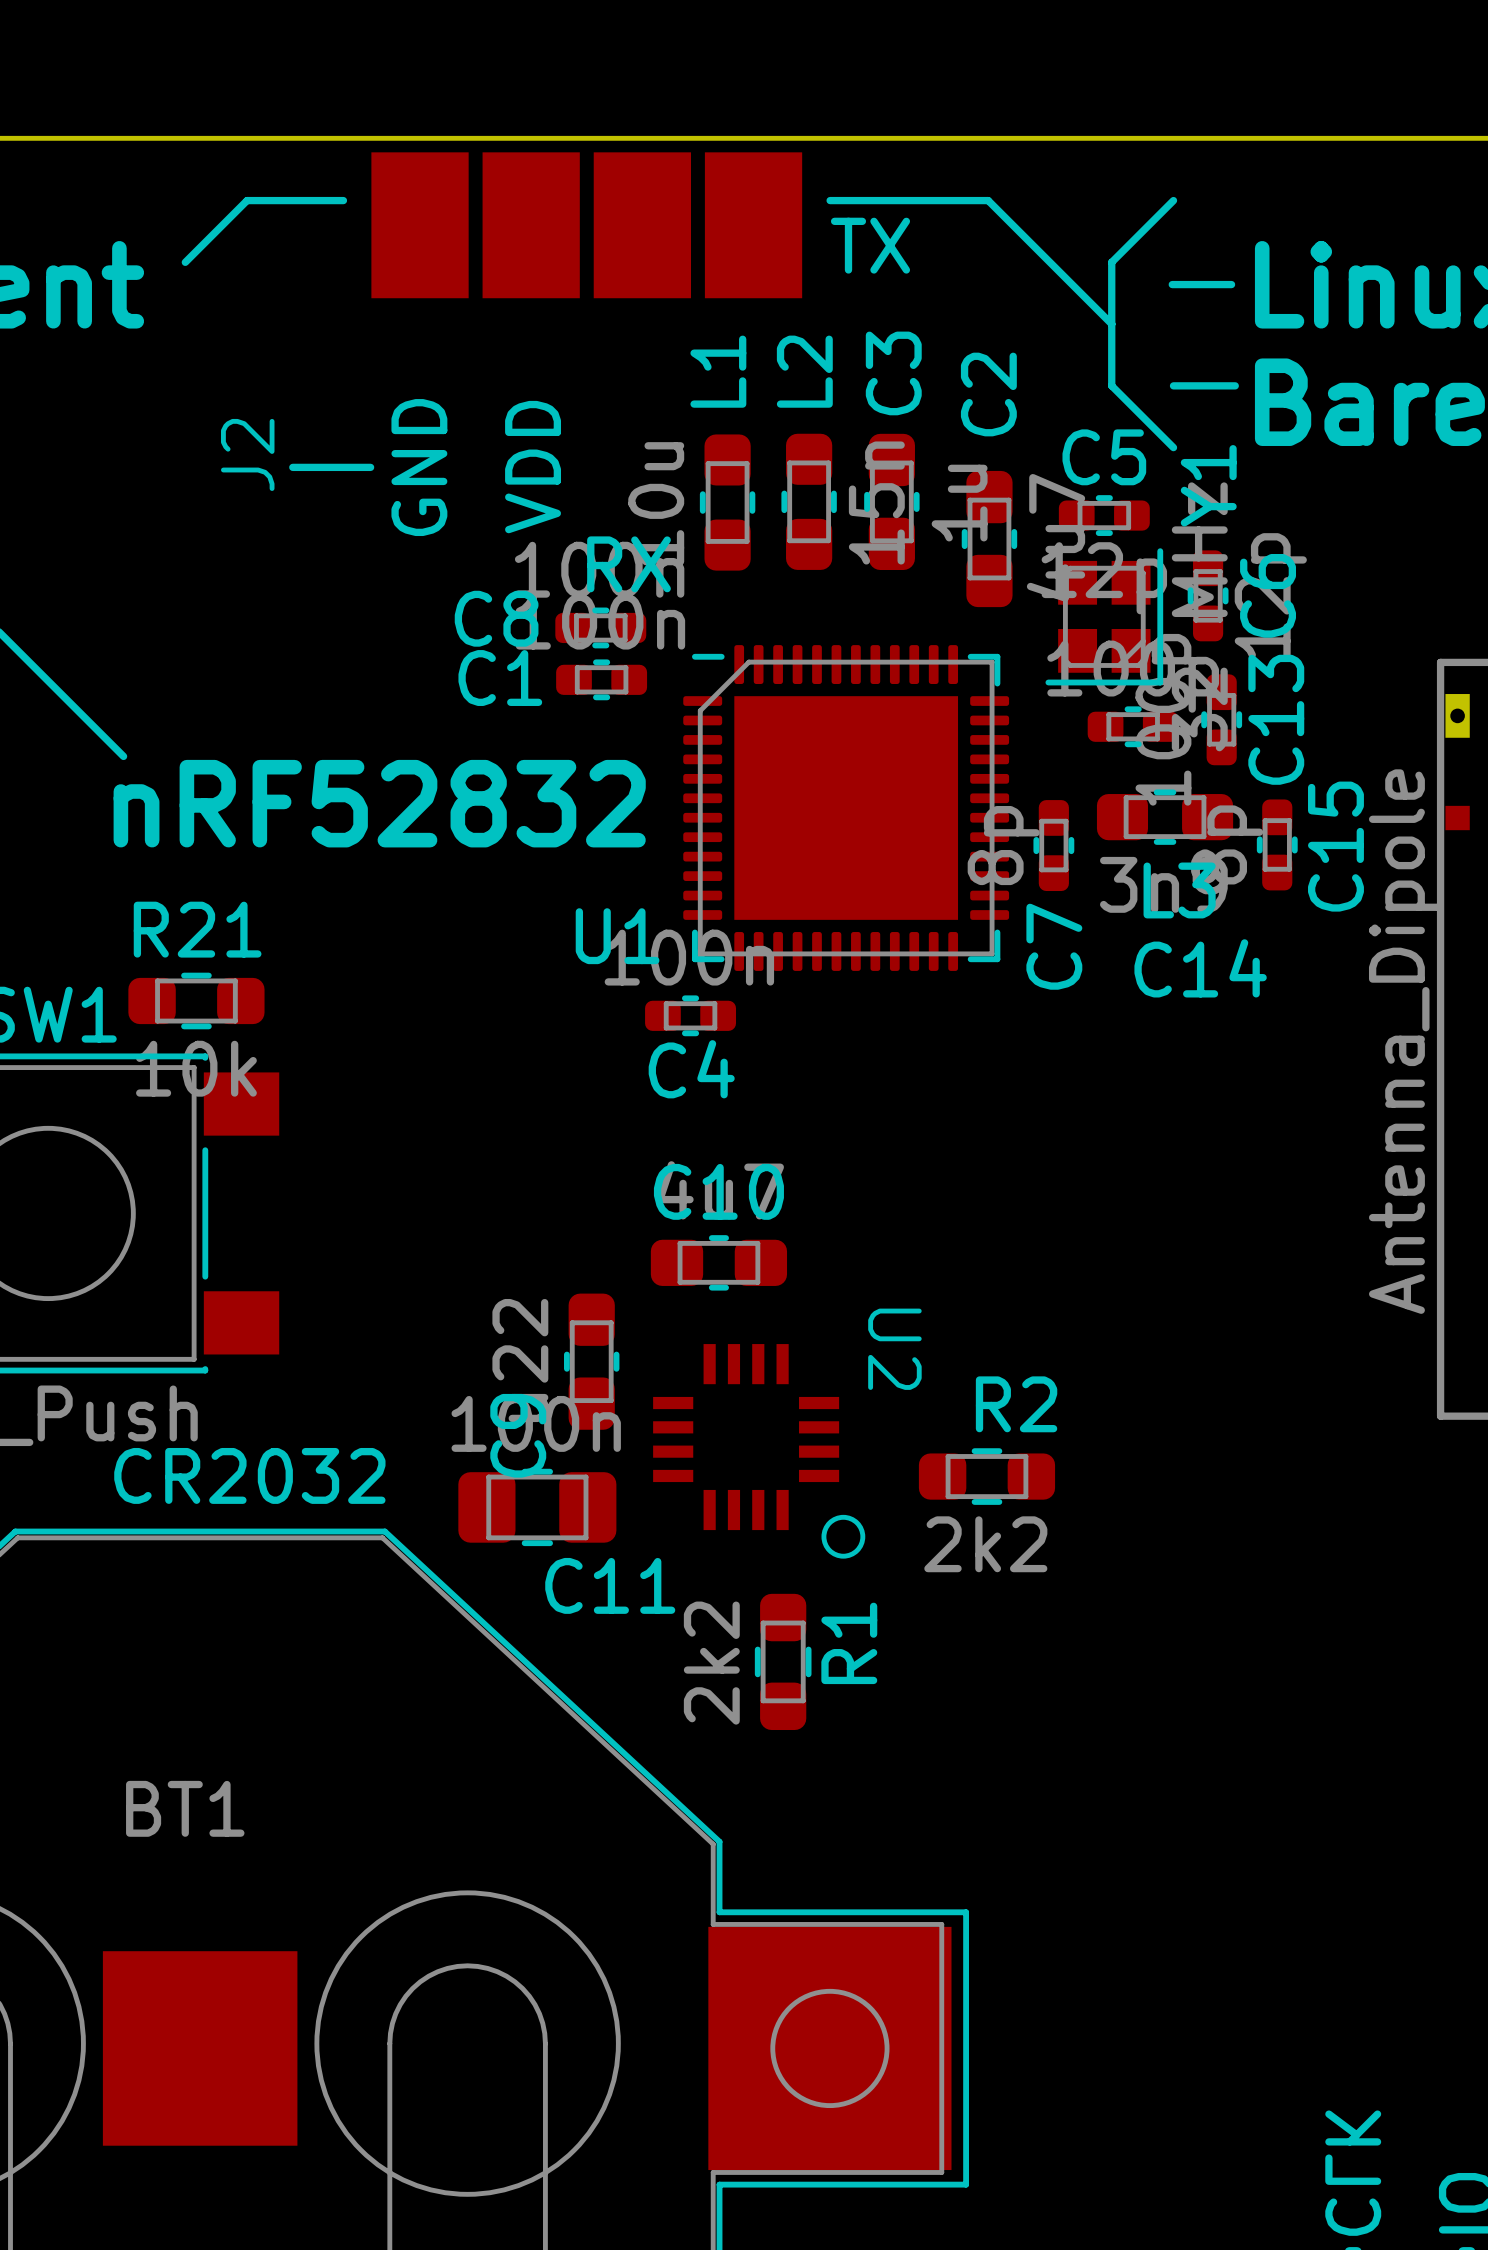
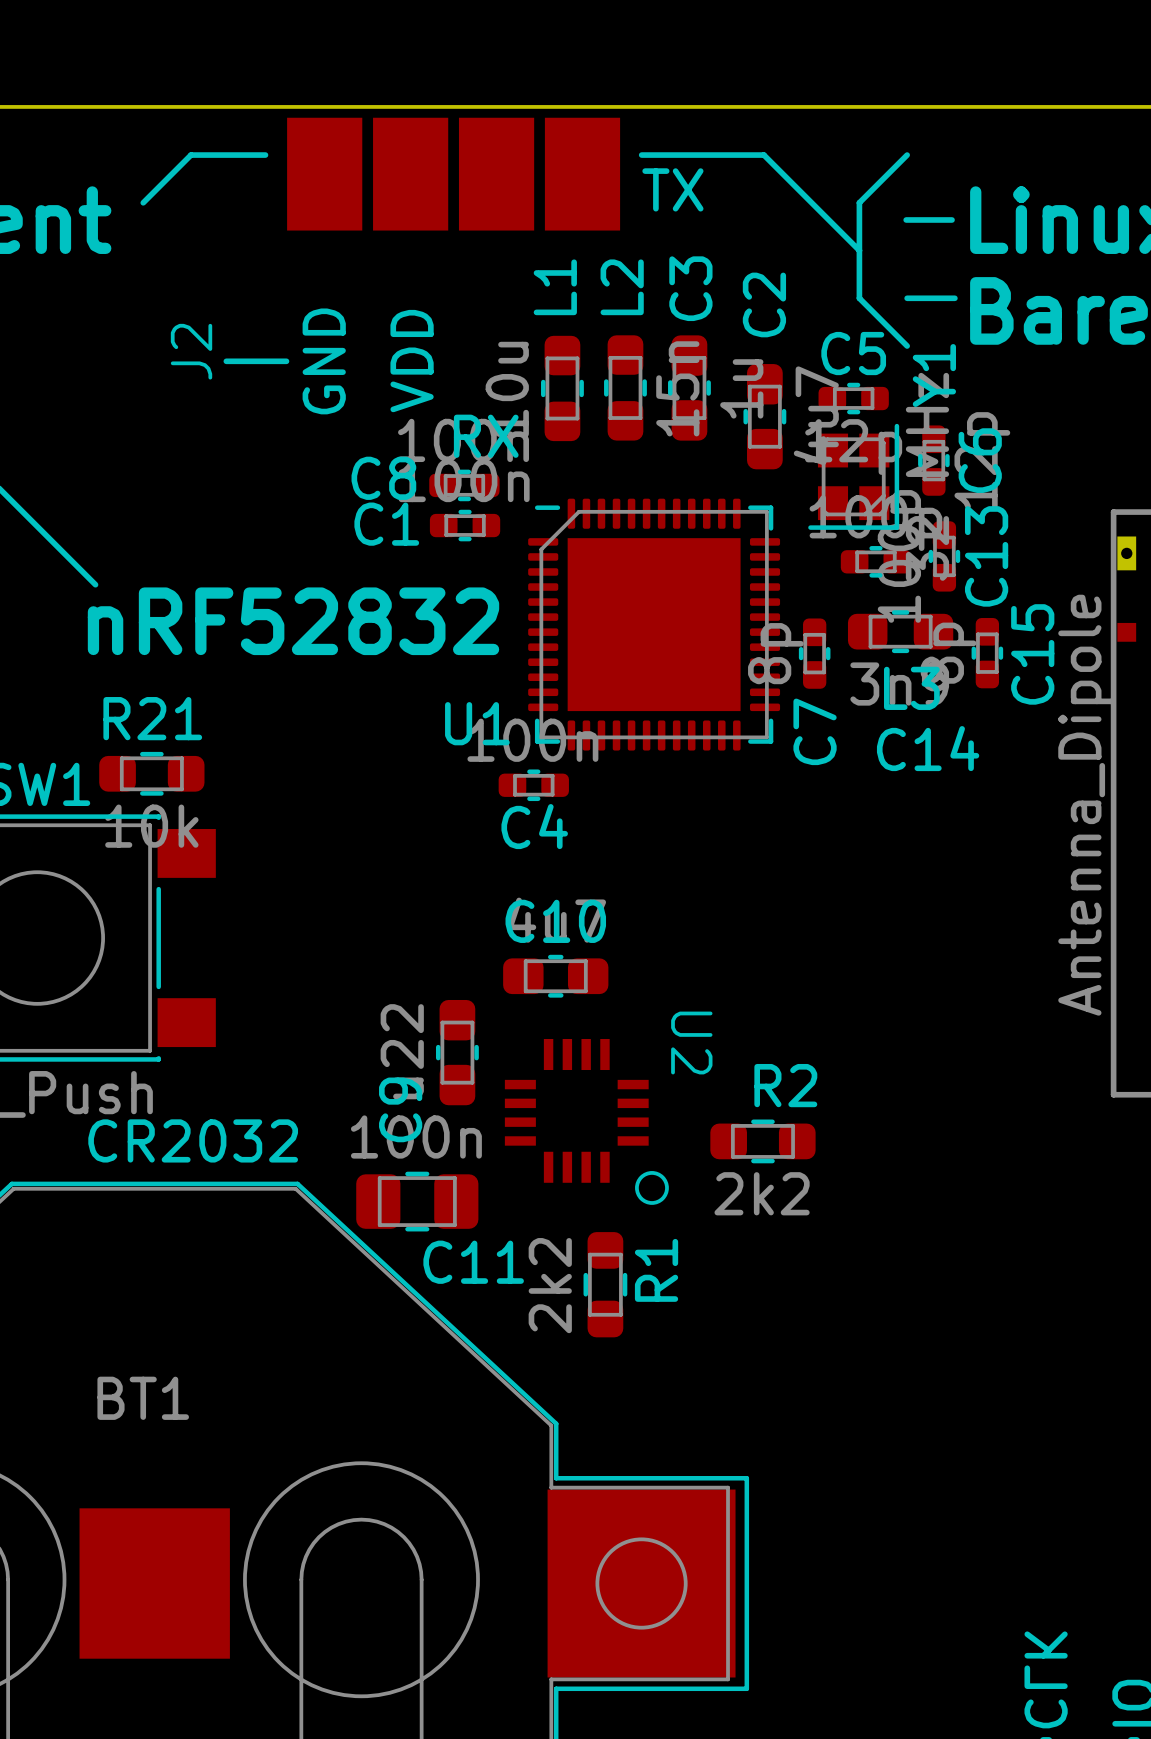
C11 position: (537, 1507) -> (417, 1201)

